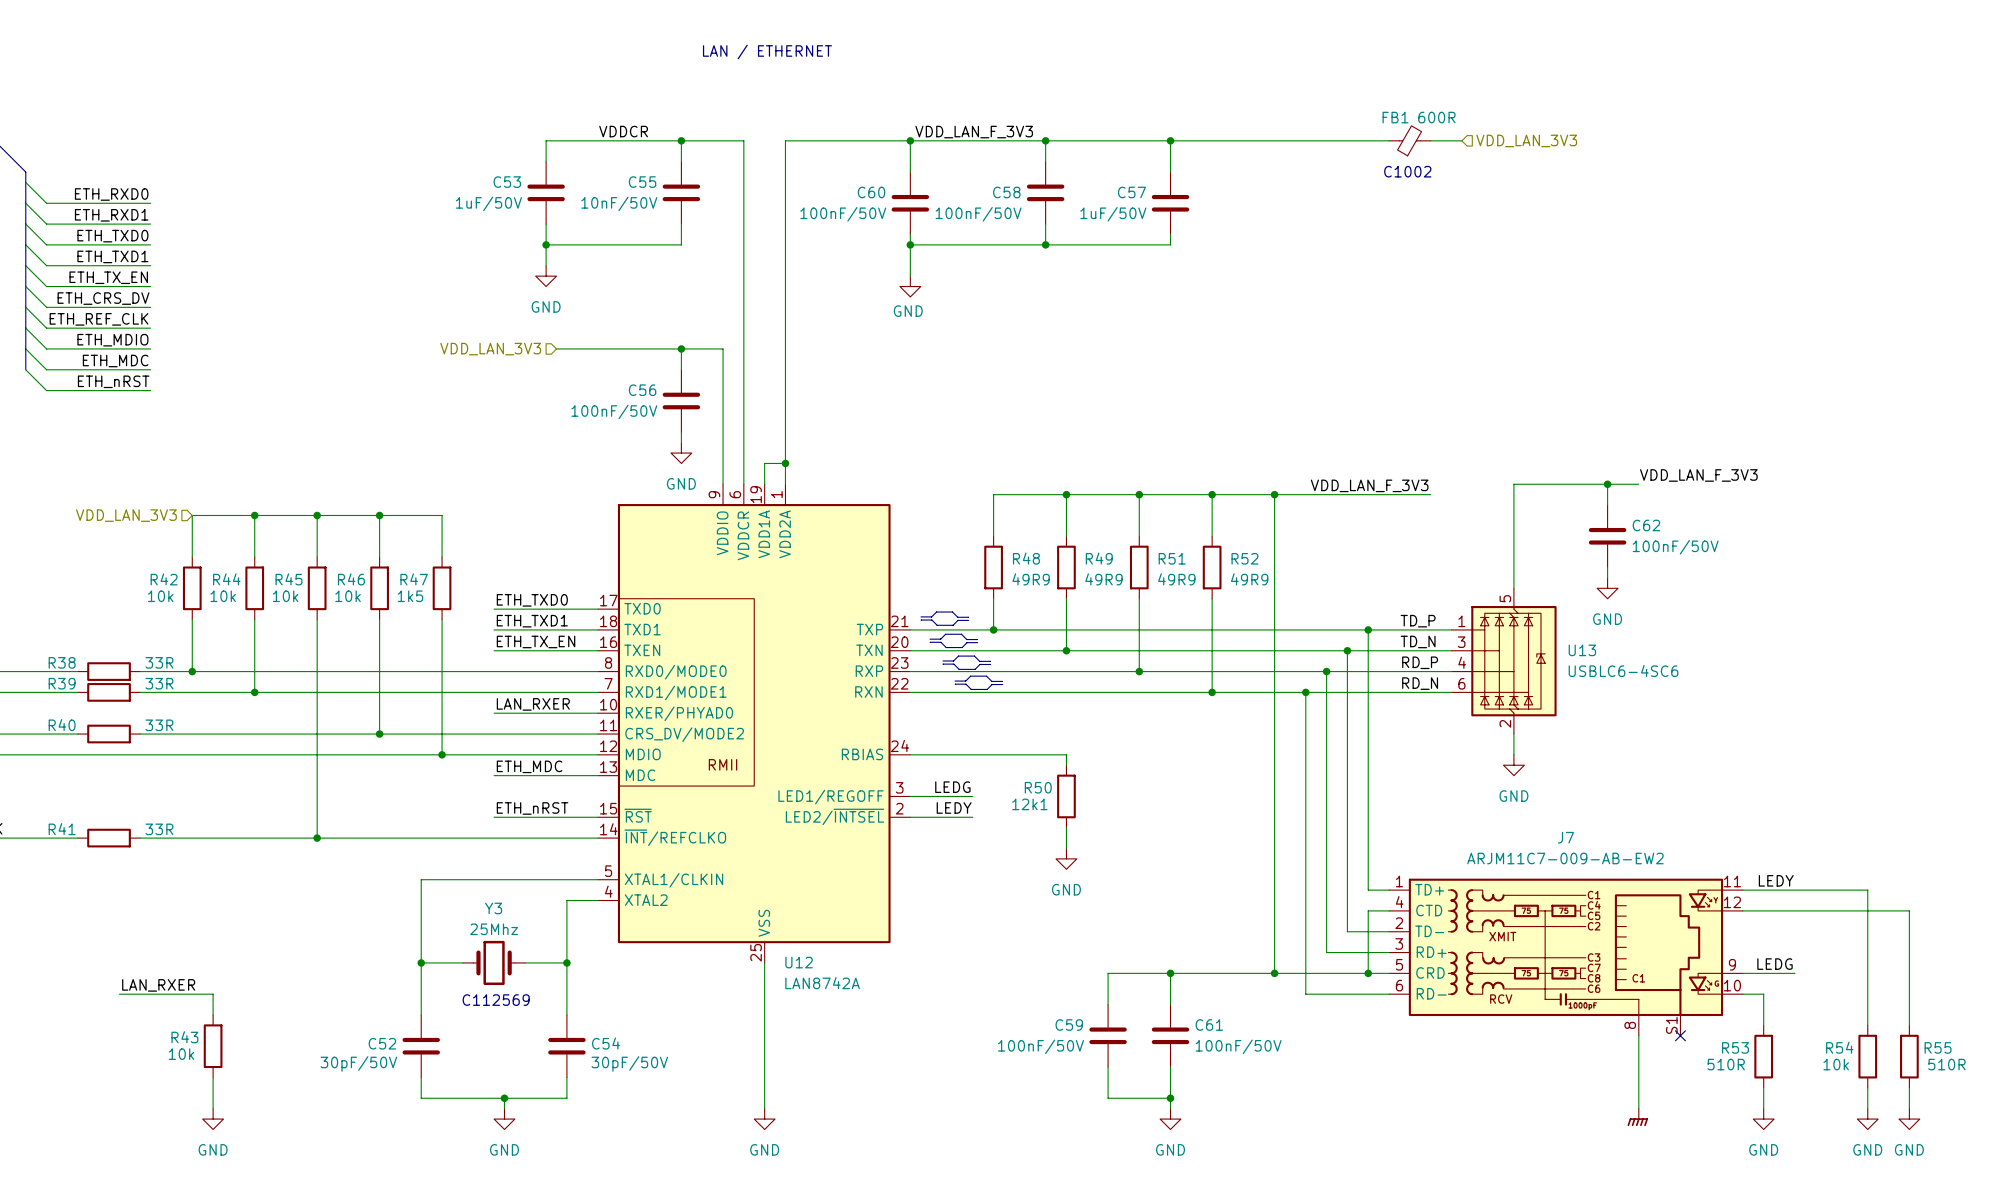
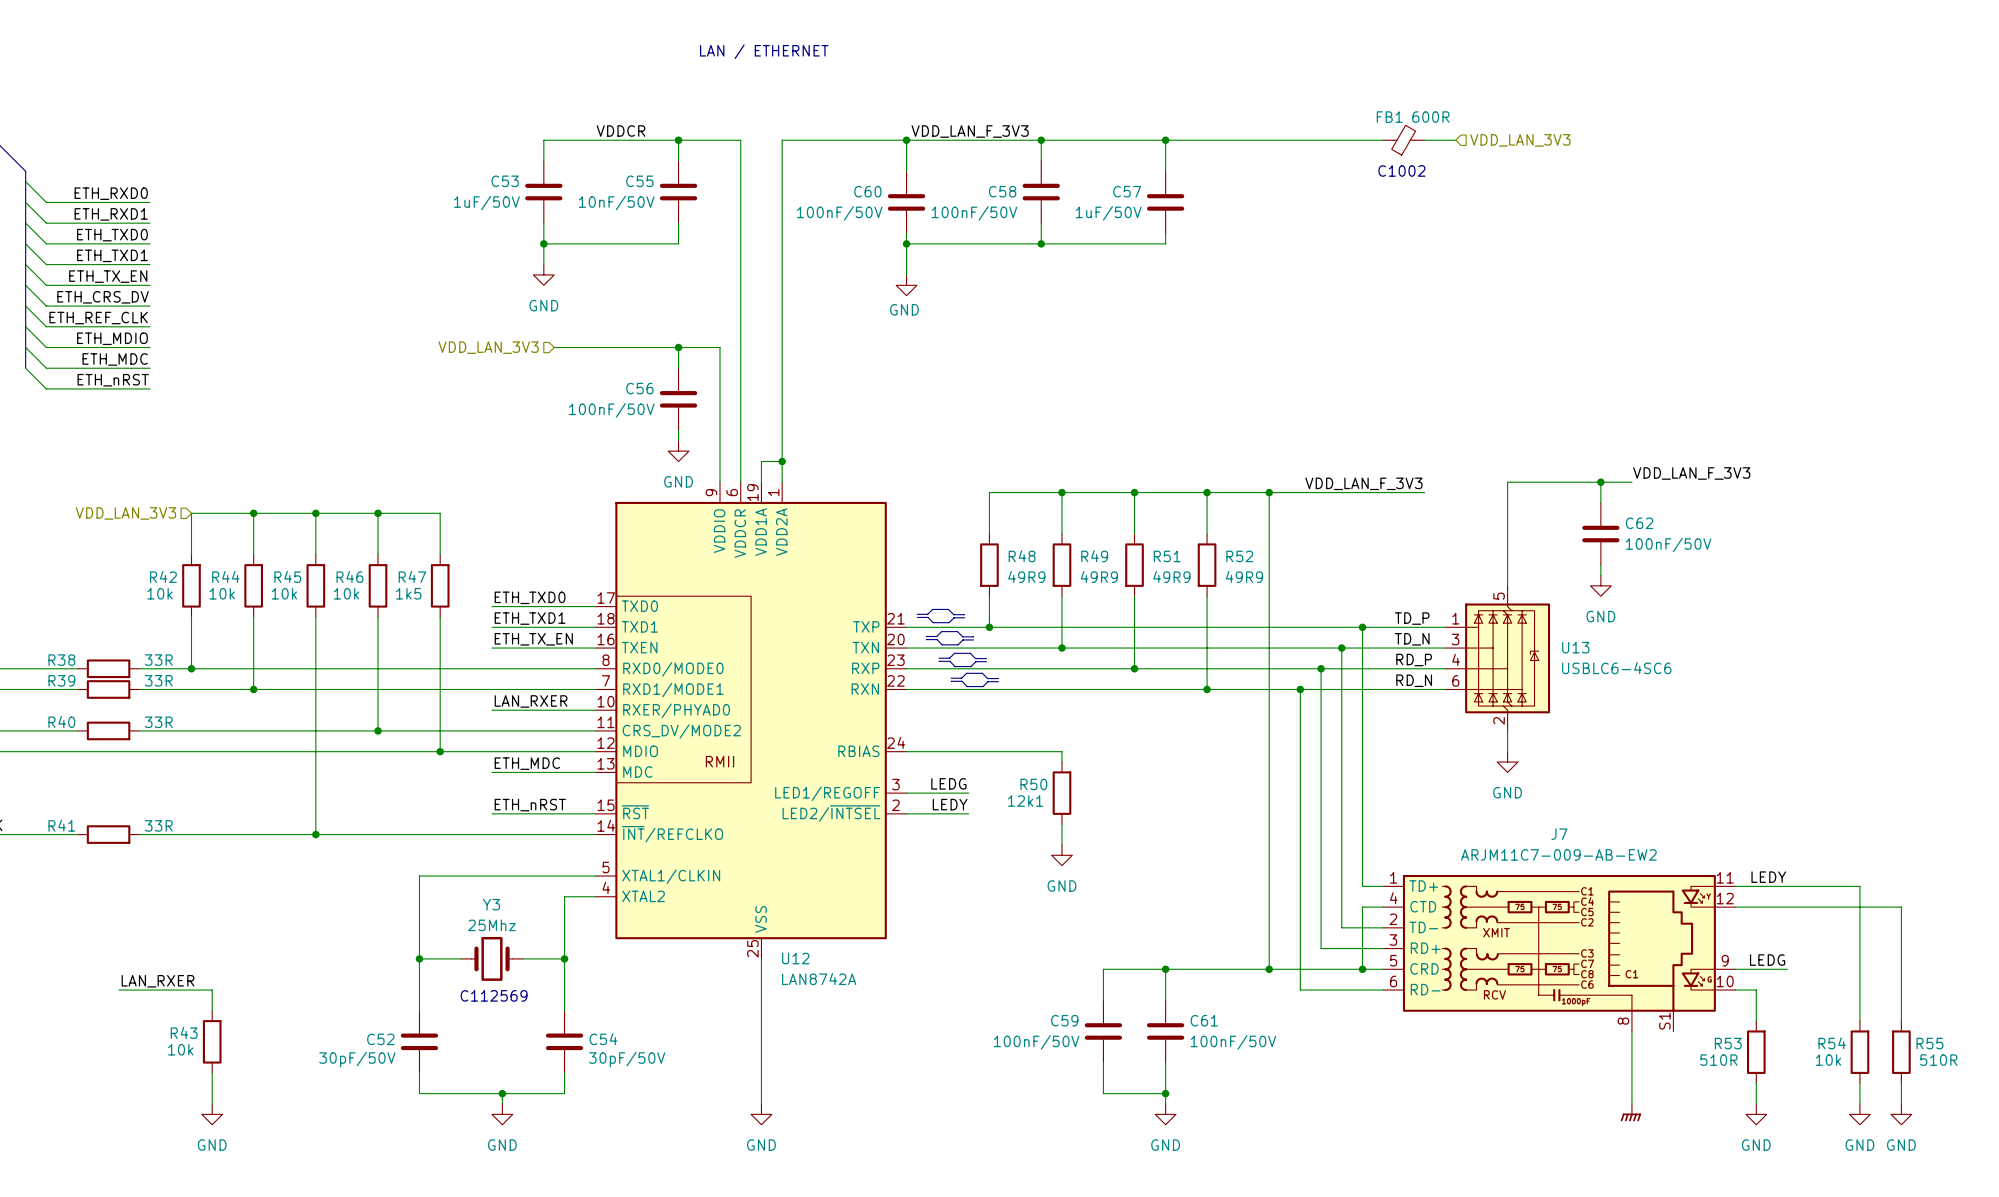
no-connect mark: (1680, 1035) -> none

